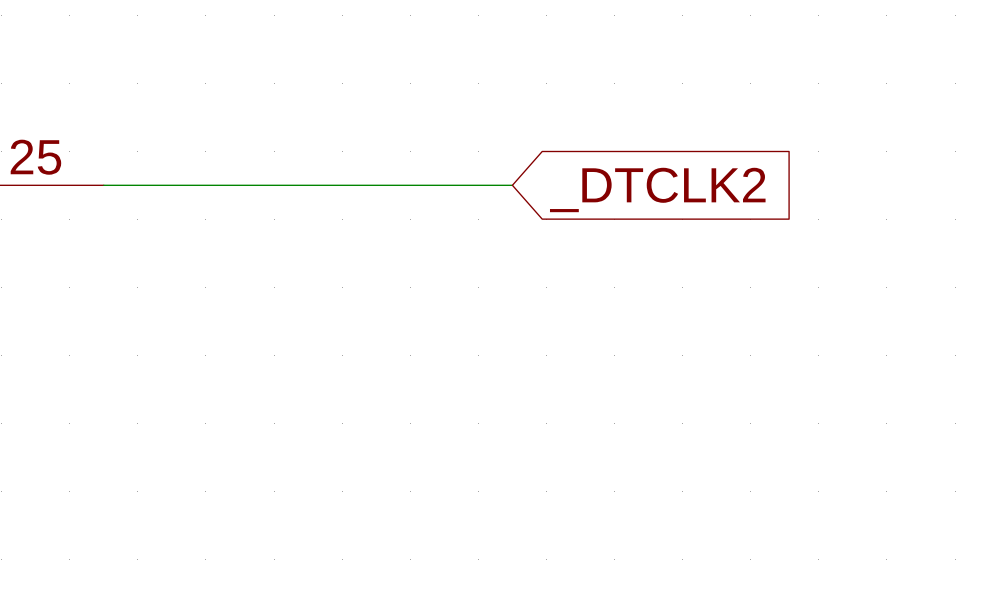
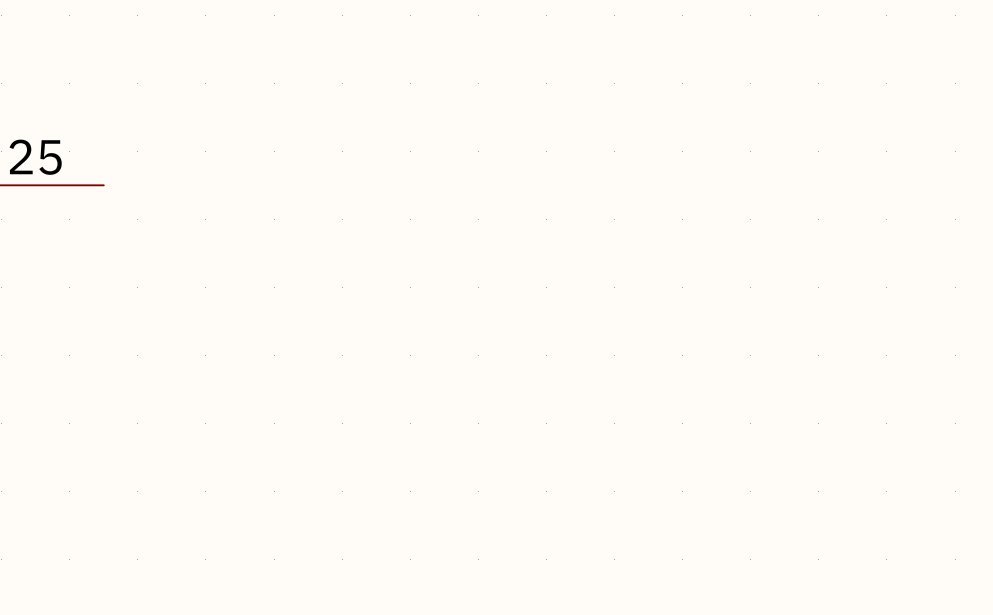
wire: (103, 185) (512, 185) -> none
global label: _DTCLK2 (657, 189) -> none

